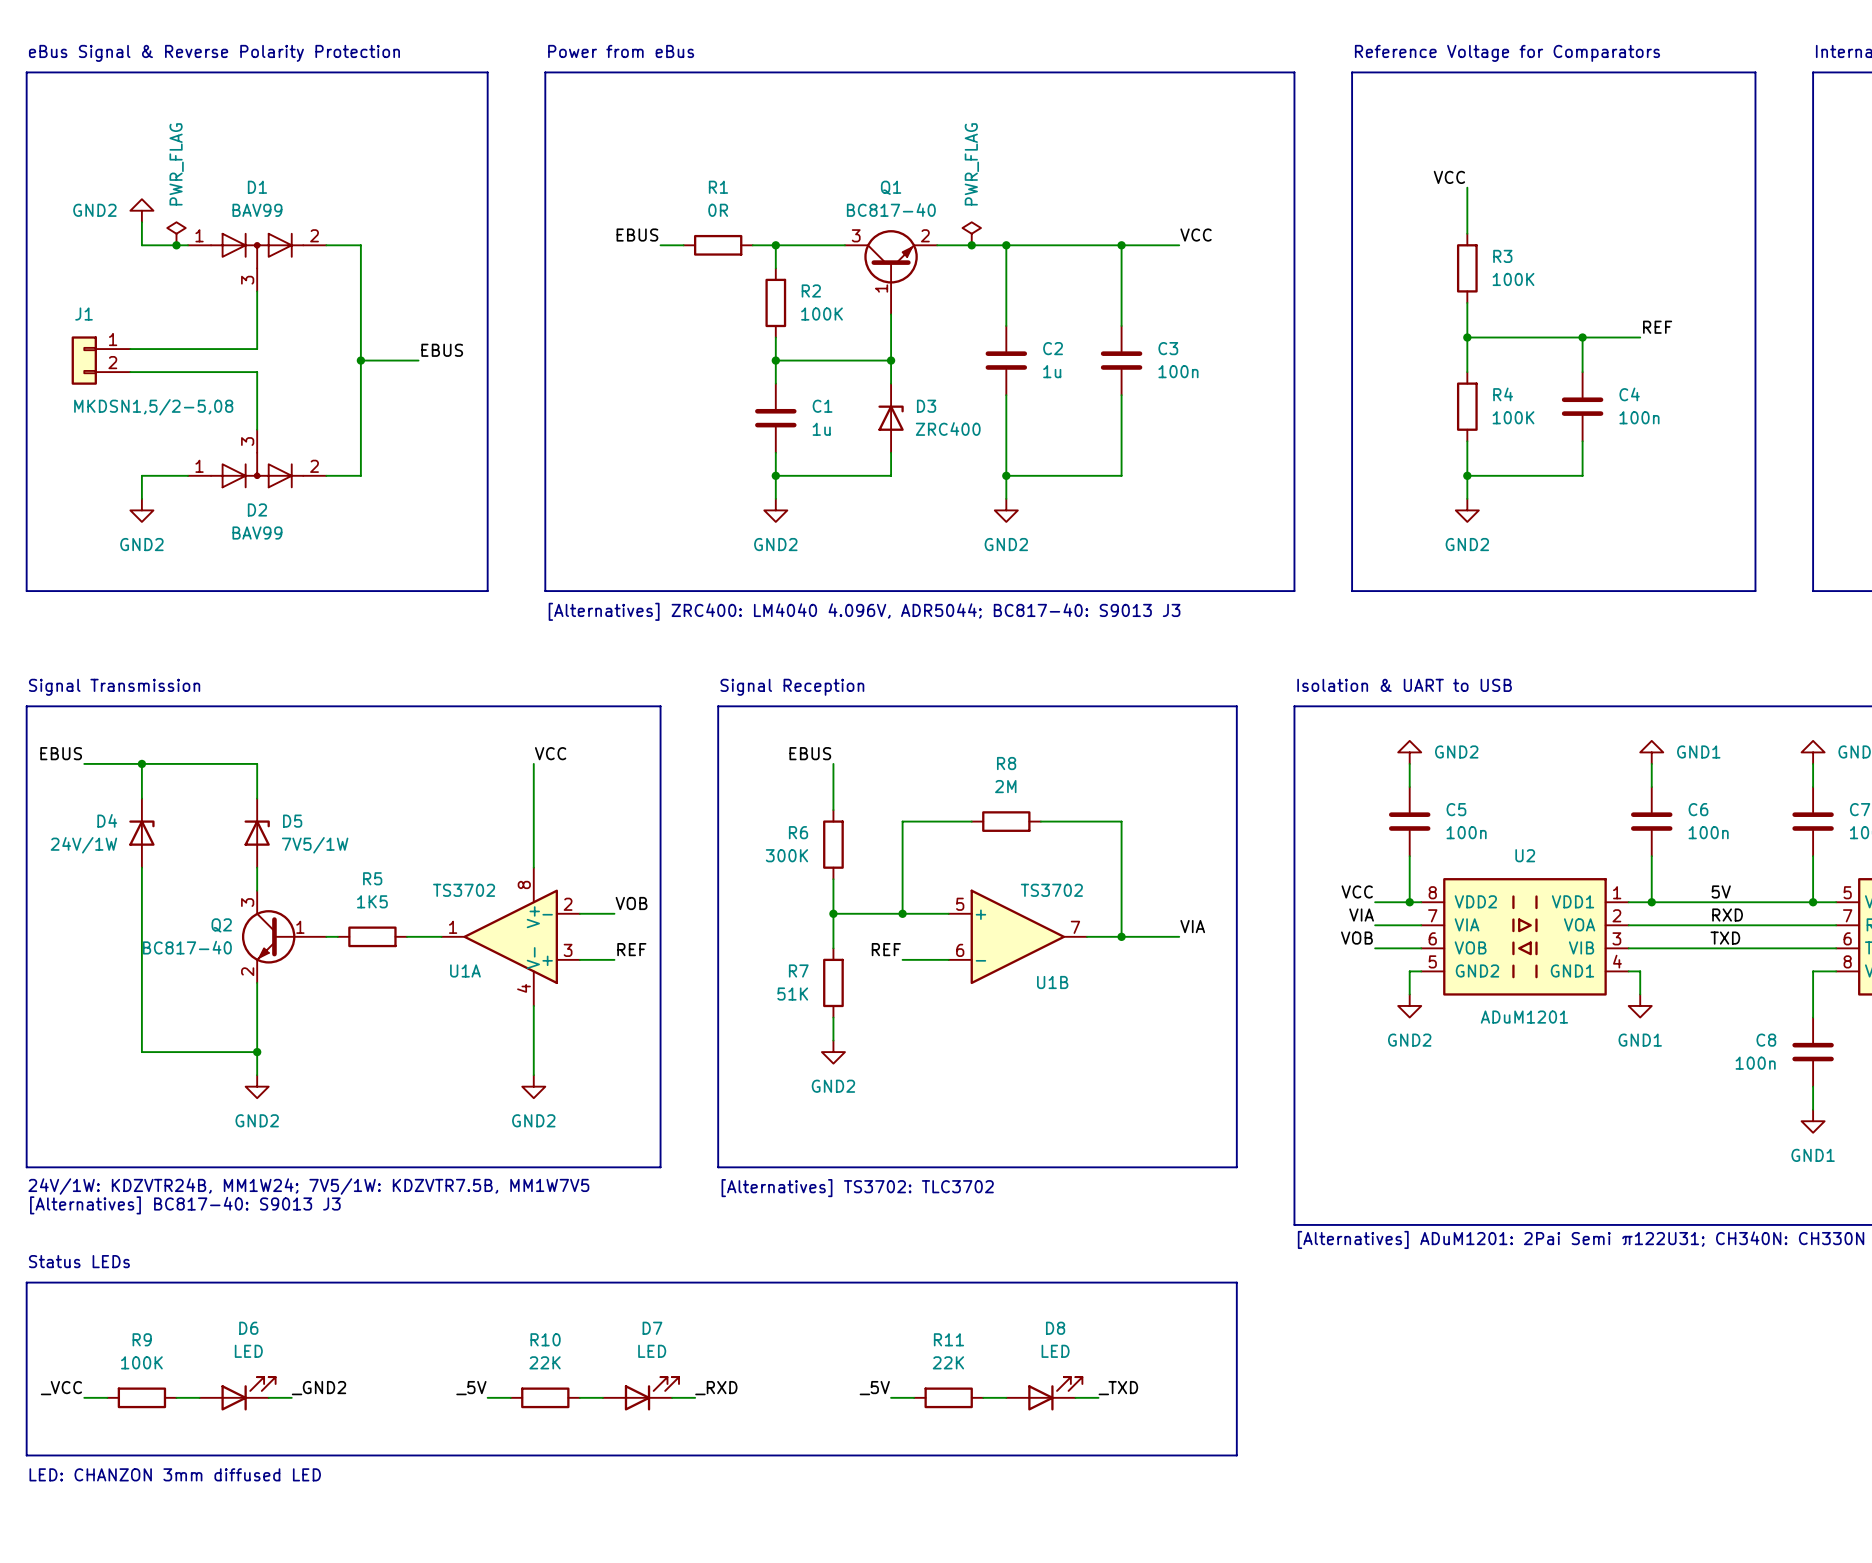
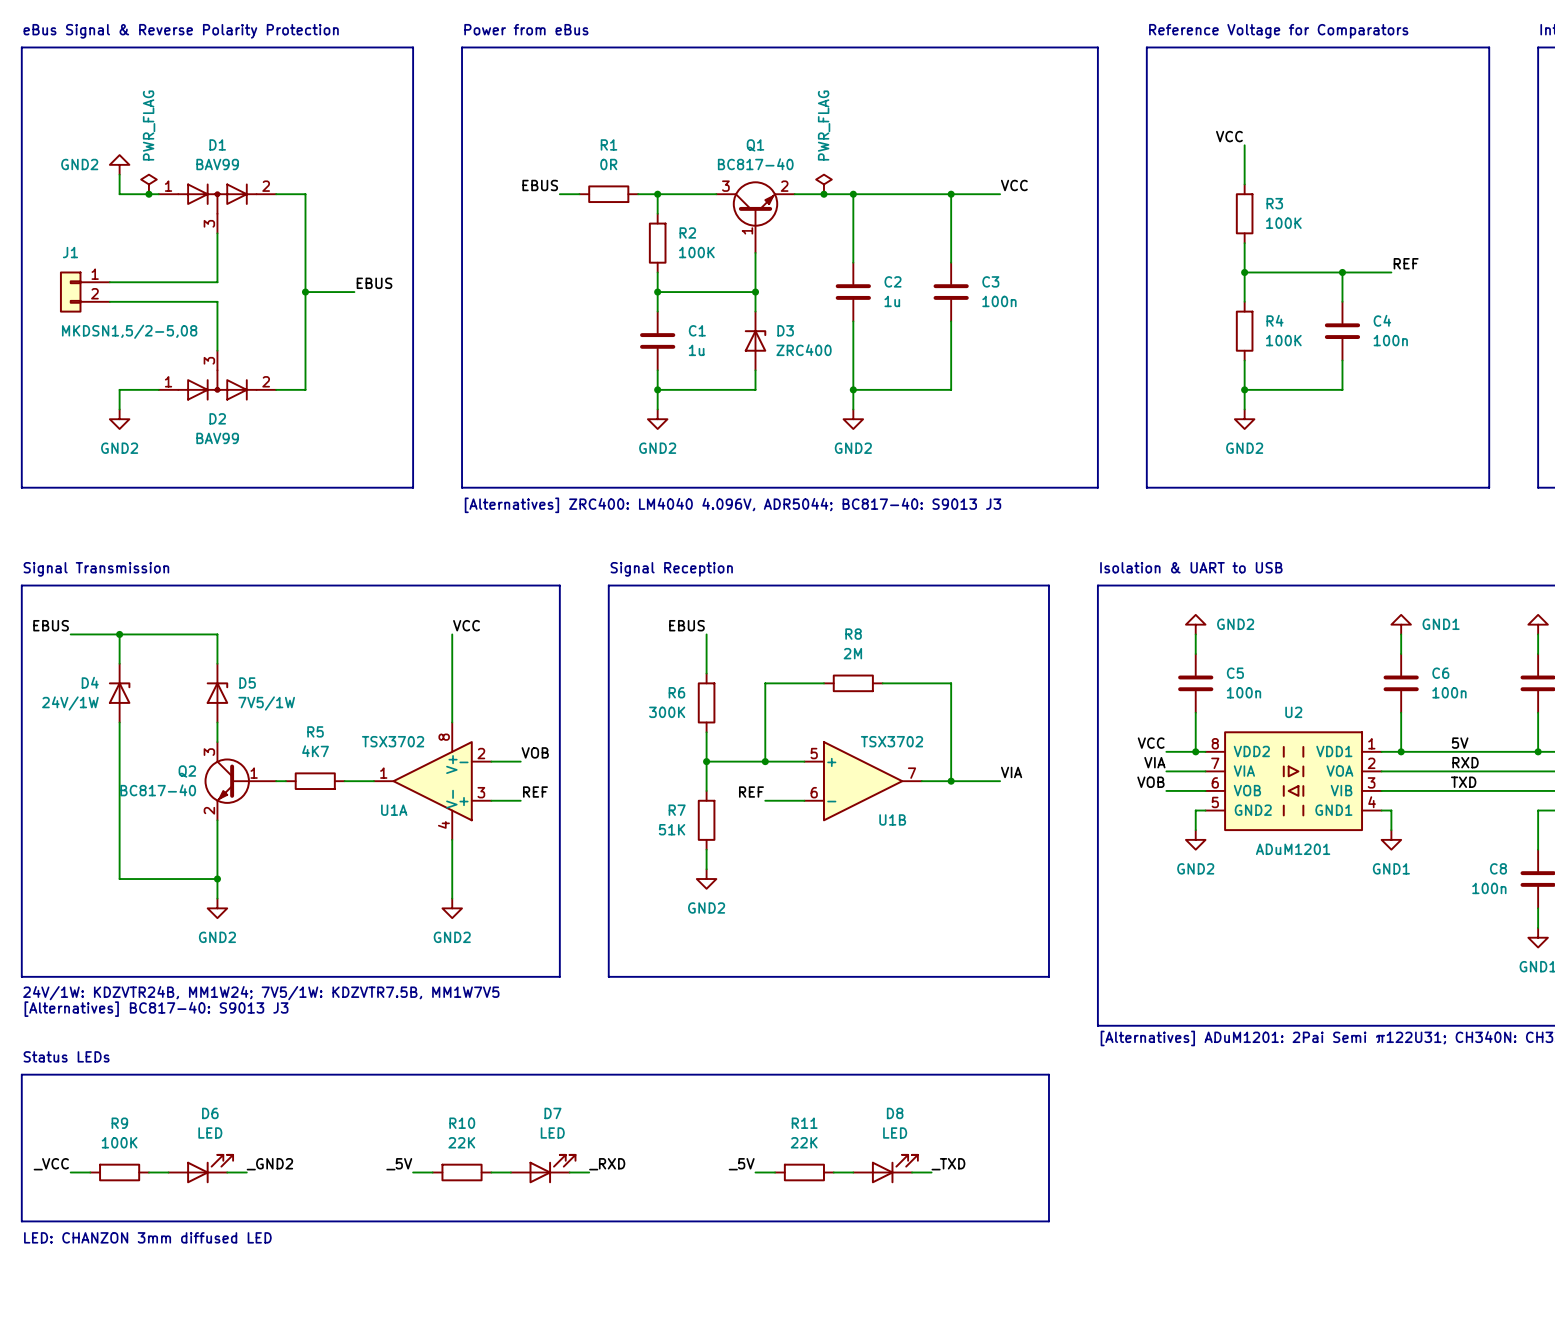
U1A value: TS3702 (464, 890) -> TSX3702 (393, 741)
U1B value: TS3702 (1051, 890) -> TSX3702 (892, 741)
R5 value: 1K5 (372, 901) -> 4K7 (315, 751)
text: [Alternatives] TS3702: TLC3702 (857, 1188) -> none

